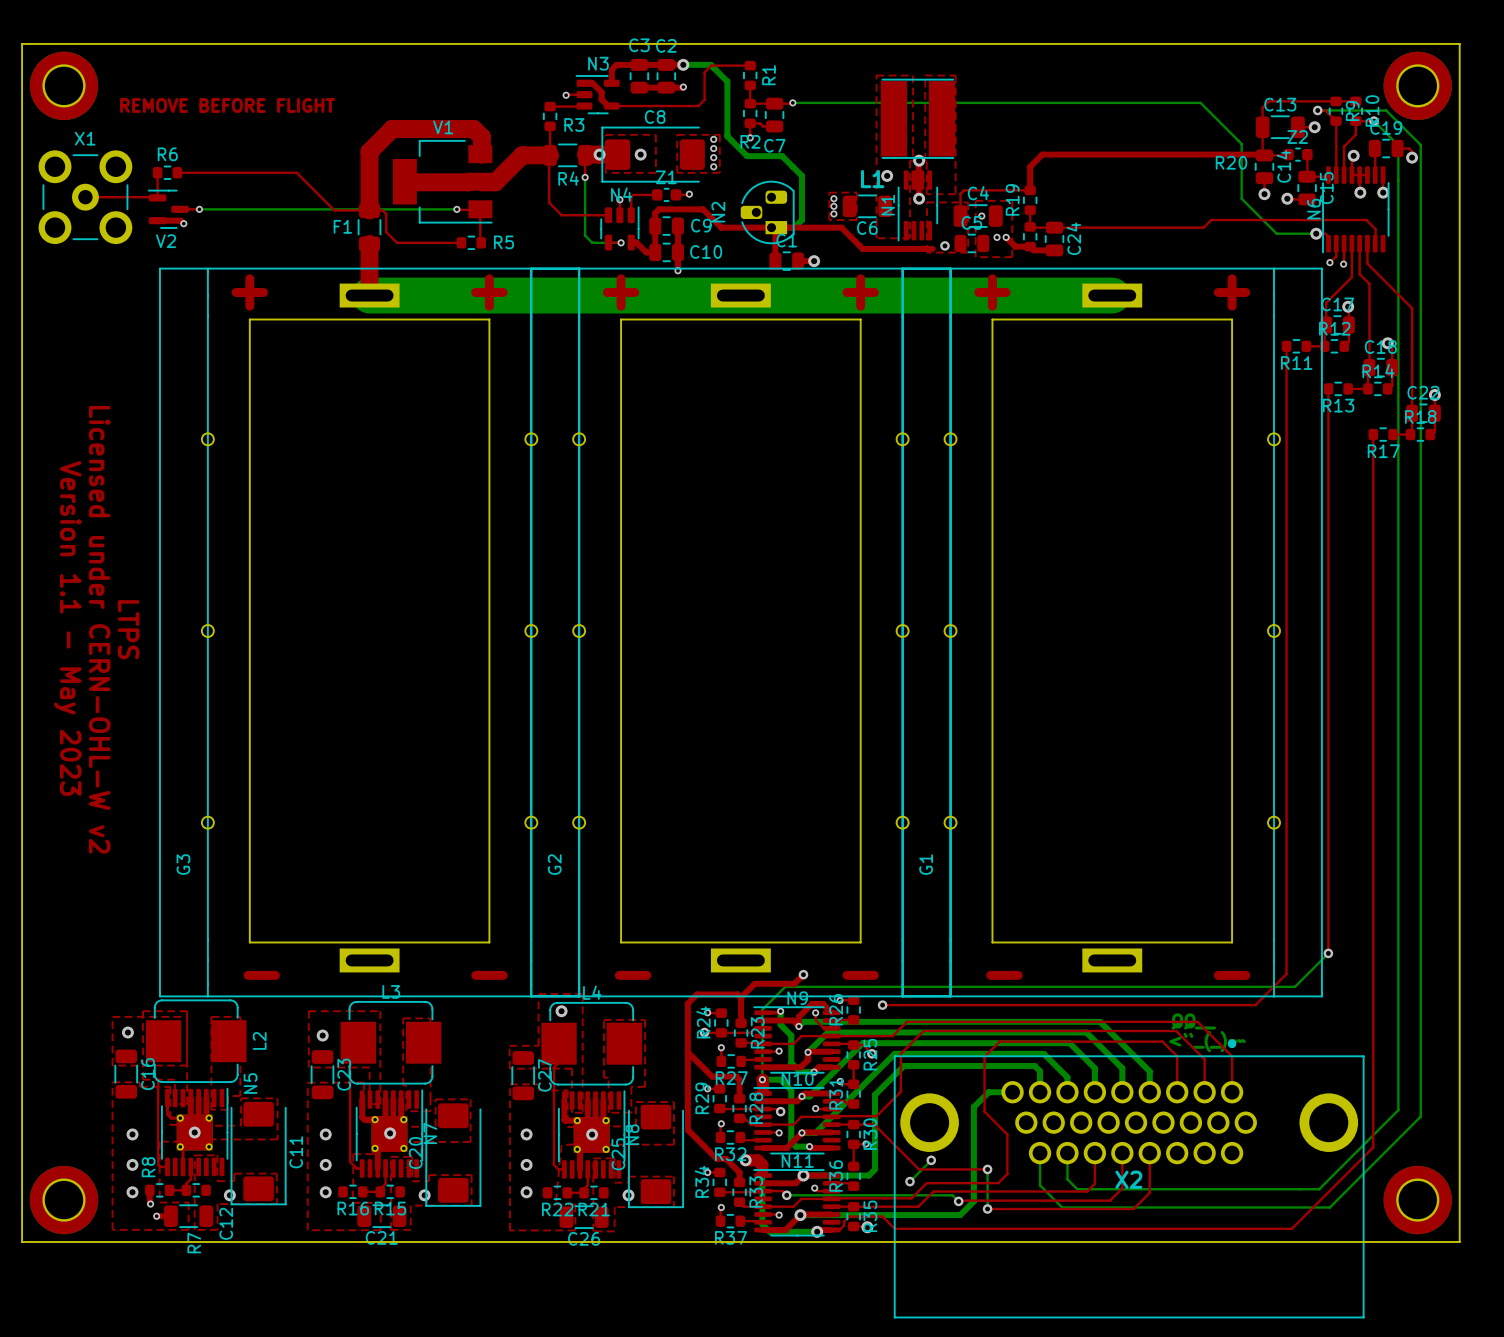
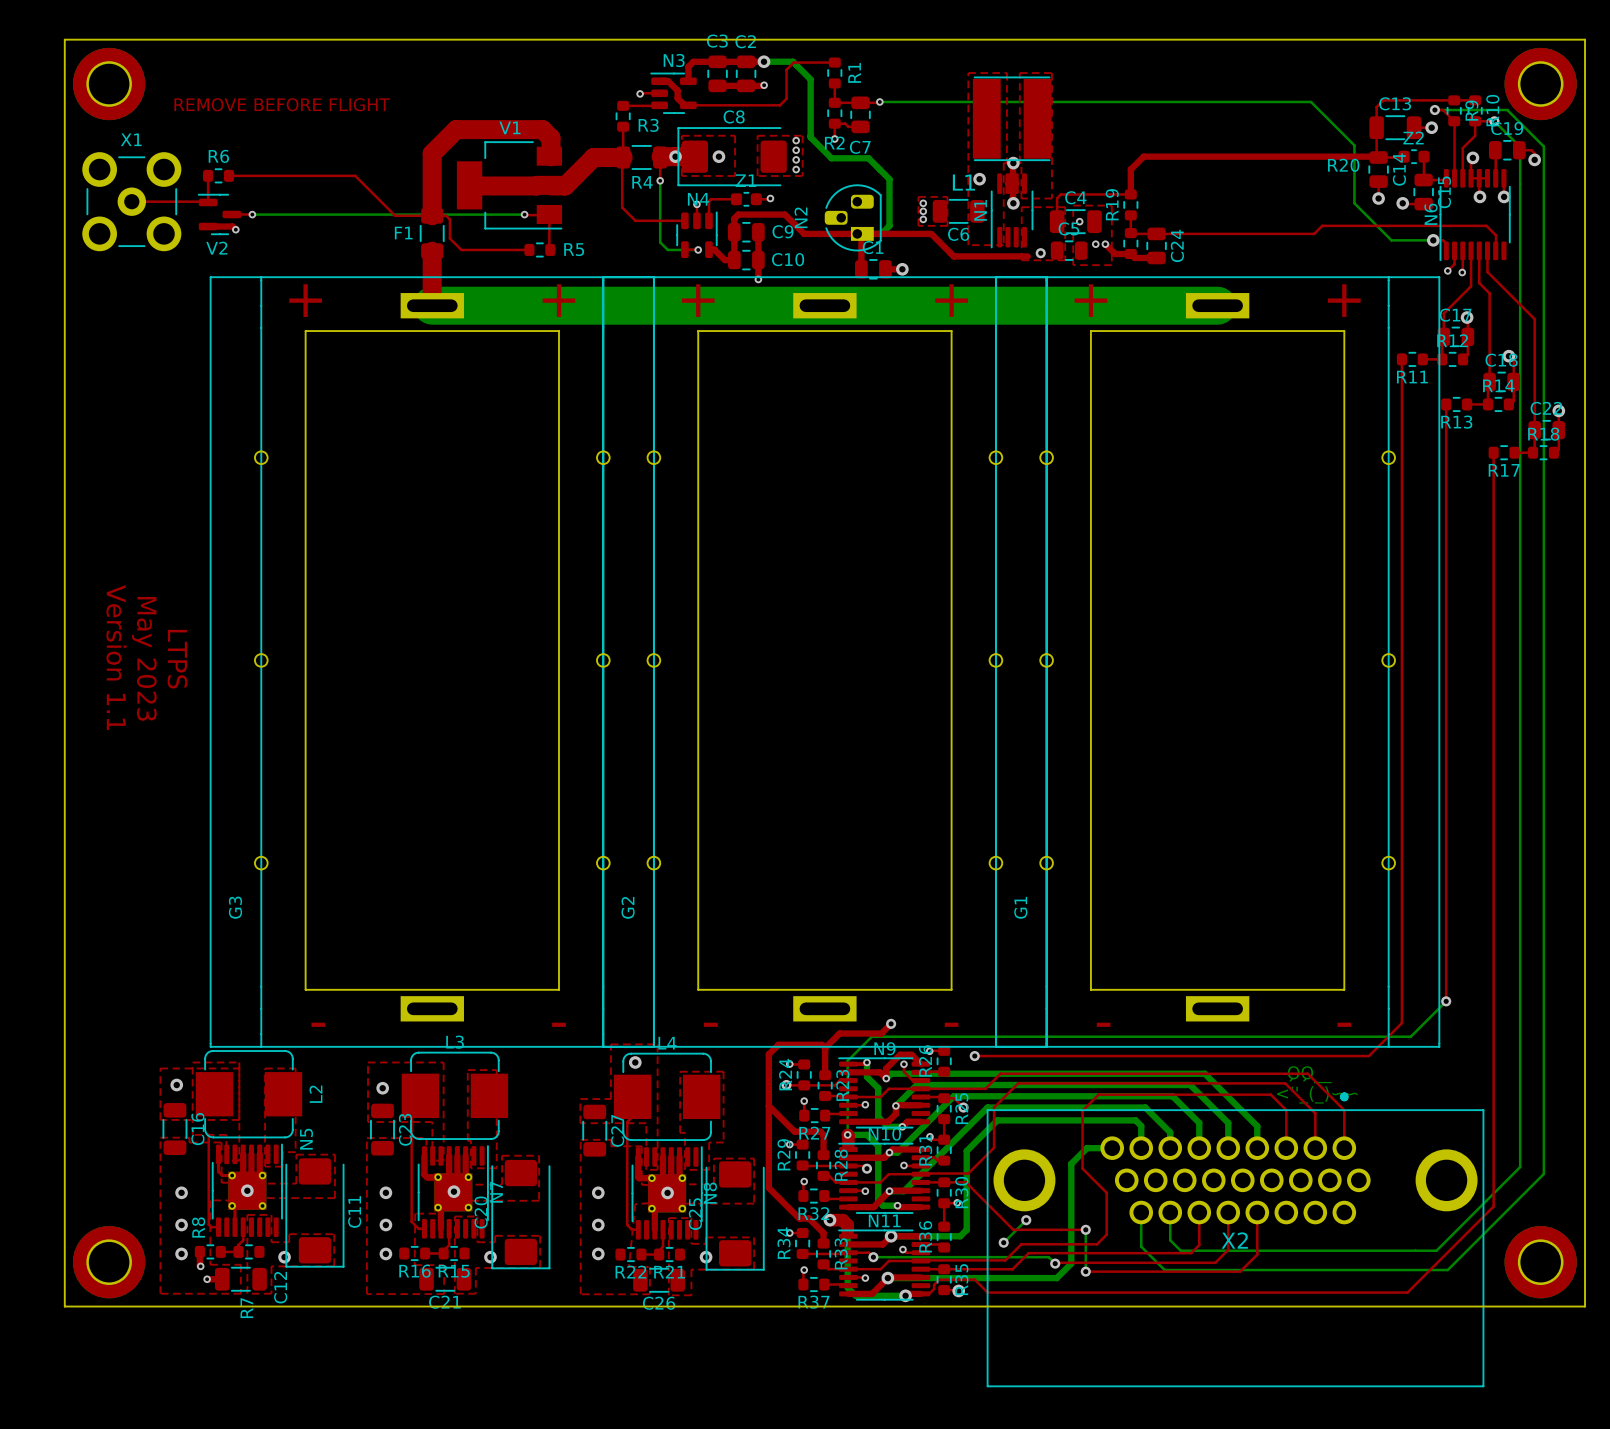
text: Version 1.1 - May 2023 (67, 628) -> Version 1.1 (116, 657)
text: Licensed under CERN-OHL-W v2 (99, 629) -> May 2023 (144, 658)

